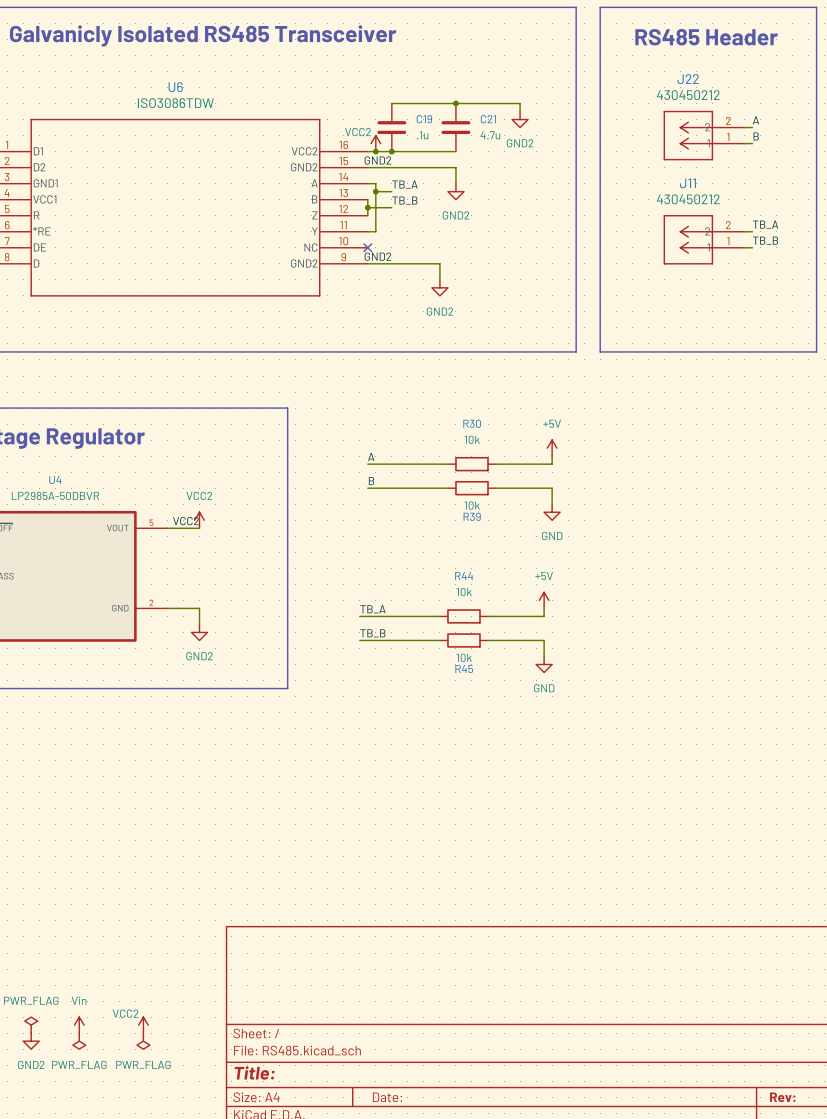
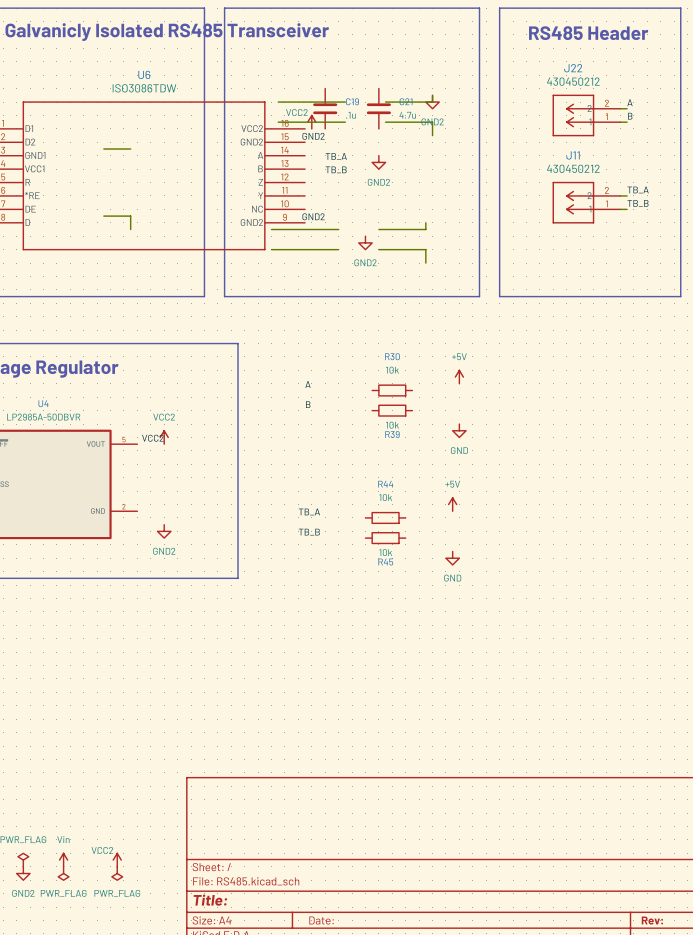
line: (247, 7) (271, 7) -> (204, 8) (204, 296)
wire: (391, 103) (520, 103) (520, 111) -> (385, 102) (432, 102) (432, 95)
junction: (455, 103) -> none
wire: none -> (278, 102) (345, 102)
wire: none -> (278, 122) (345, 122)
wire: none -> (385, 122) (432, 122) (432, 135)
wire: (367, 151) (455, 151) -> none
junction: (375, 151) -> none
junction: (391, 151) -> none
wire: (367, 167) (455, 167) (455, 183) -> none
wire: none -> (103, 149) (130, 149)
wire: (367, 183) (375, 183) (375, 231) (367, 231) -> none
wire: (375, 191) (391, 191) -> none
junction: (375, 191) -> none
wire: (367, 199) (367, 215) -> none
wire: (367, 207) (391, 207) -> none
junction: (367, 207) -> none
no-connect mark: (367, 247) -> none
wire: none -> (103, 216) (130, 216) (130, 229)
wire: (367, 263) (439, 263) (439, 279) -> none
wire: none -> (425, 222) (425, 229) (378, 229)
wire: none -> (271, 229) (338, 229)
wire: none -> (271, 249) (338, 249)
wire: none -> (378, 249) (425, 249) (425, 263)
line: (247, 351) (271, 351) -> (224, 8) (224, 296)
wire: (552, 456) (552, 464) (496, 464) -> none
wire: (367, 464) (447, 464) -> none
wire: (367, 488) (447, 488) -> none
wire: (496, 488) (552, 488) (552, 504) -> none
wire: (167, 528) (199, 528) -> none
wire: (167, 608) (199, 608) (199, 624) -> none
wire: (544, 608) (544, 616) (488, 616) -> none
wire: (359, 616) (439, 616) -> none
wire: (359, 640) (439, 640) -> none
wire: (488, 640) (544, 640) (544, 656) -> none

